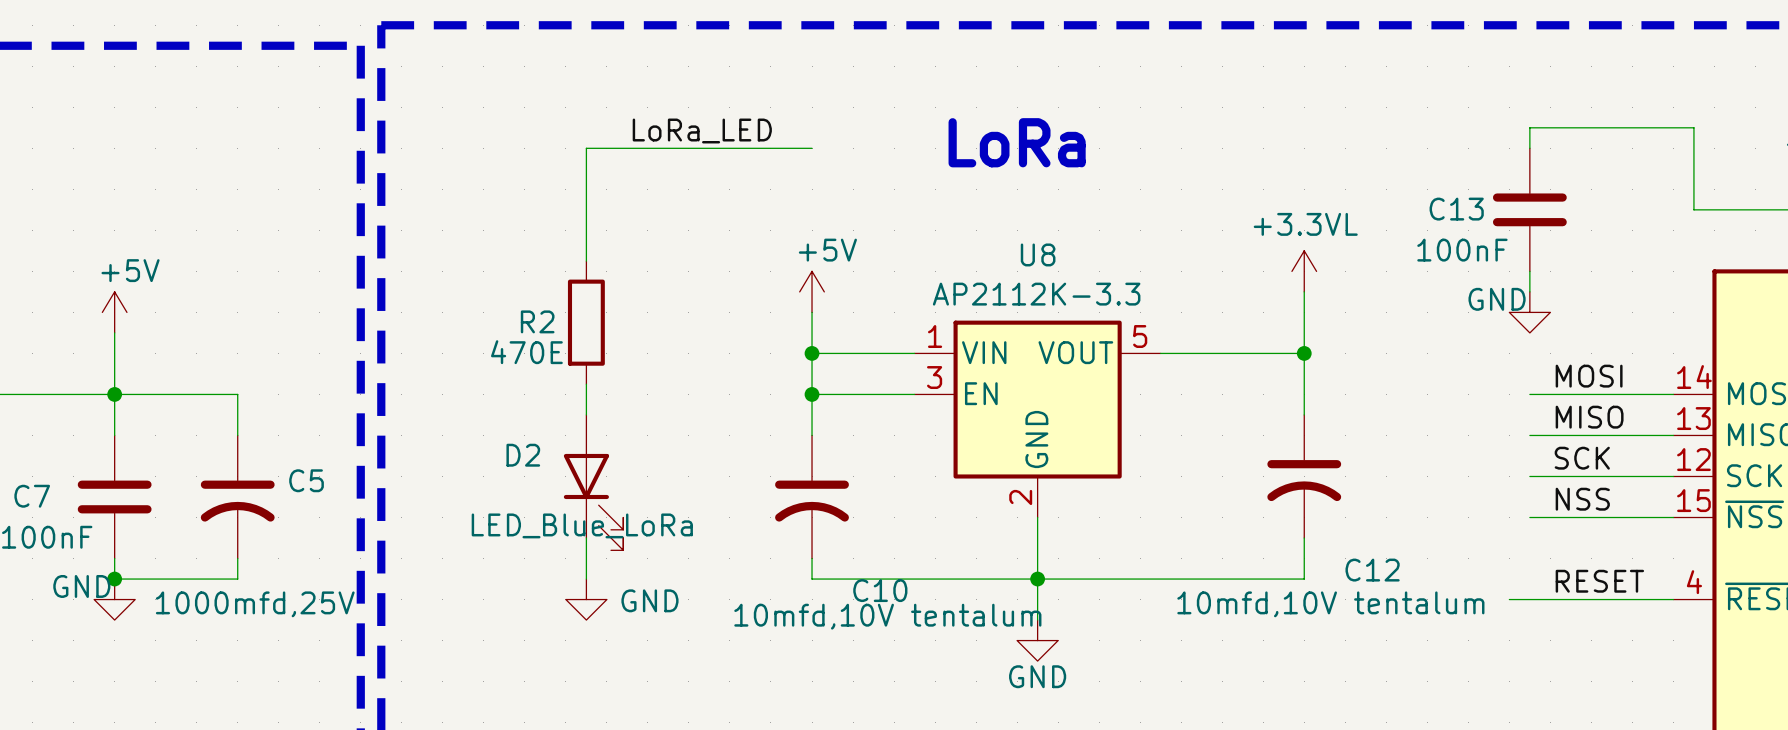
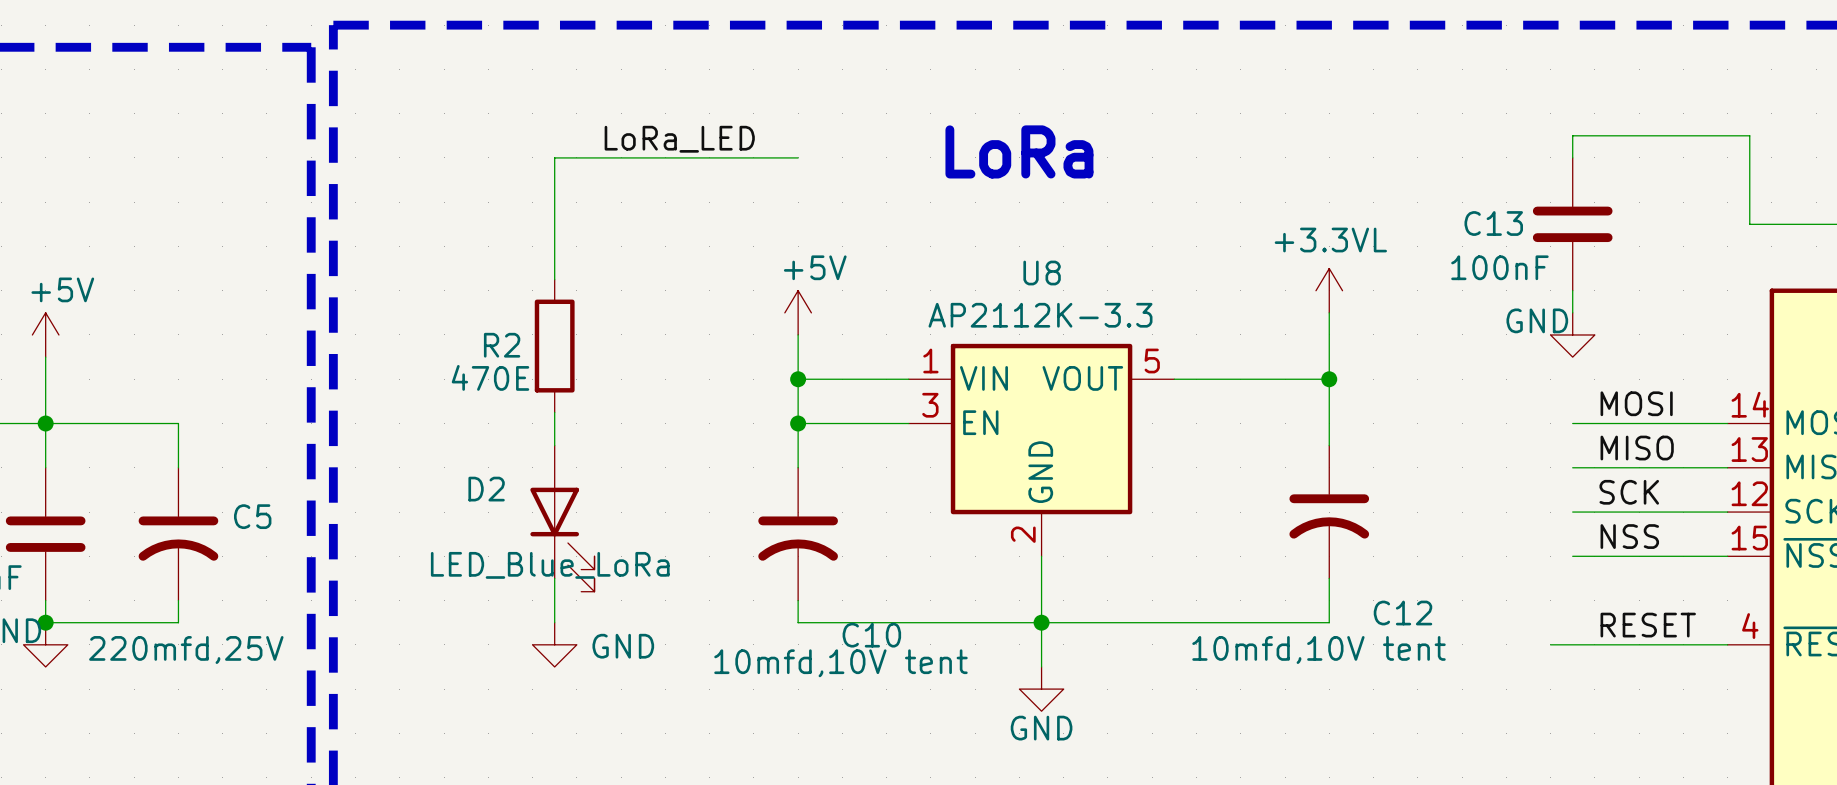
C5 value: 1000mfd,25V (255, 604) -> 220mfd,25V (186, 650)
C12 value: 10mfd,10V tentalum (1330, 604) -> 10mfd,10V tent (1319, 650)
C10 value: 10mfd,10V tentalum (887, 616) -> 10mfd,10V tent (840, 663)

